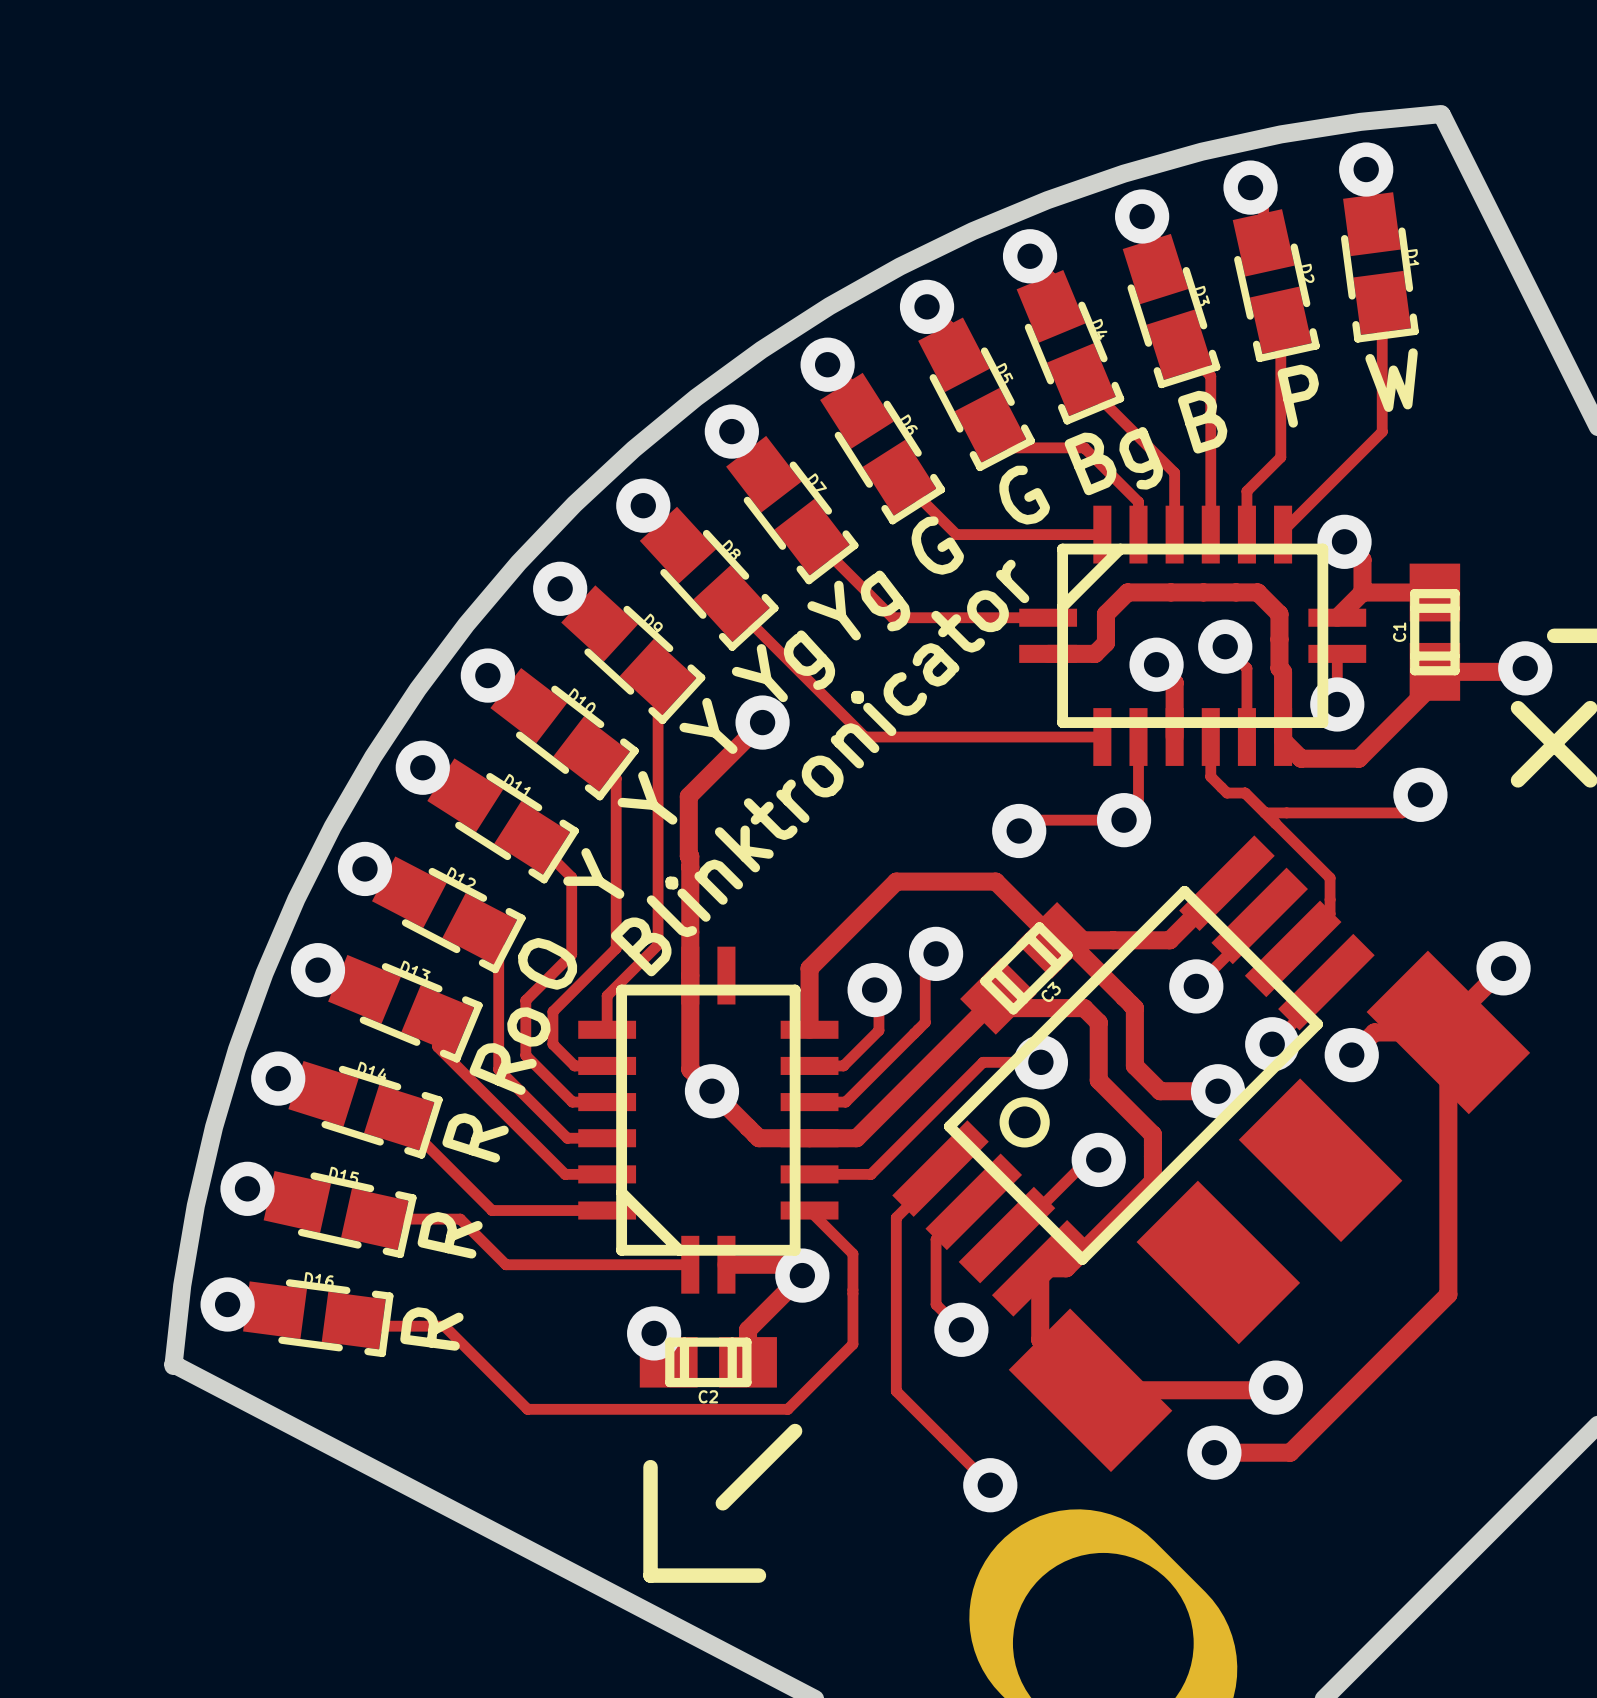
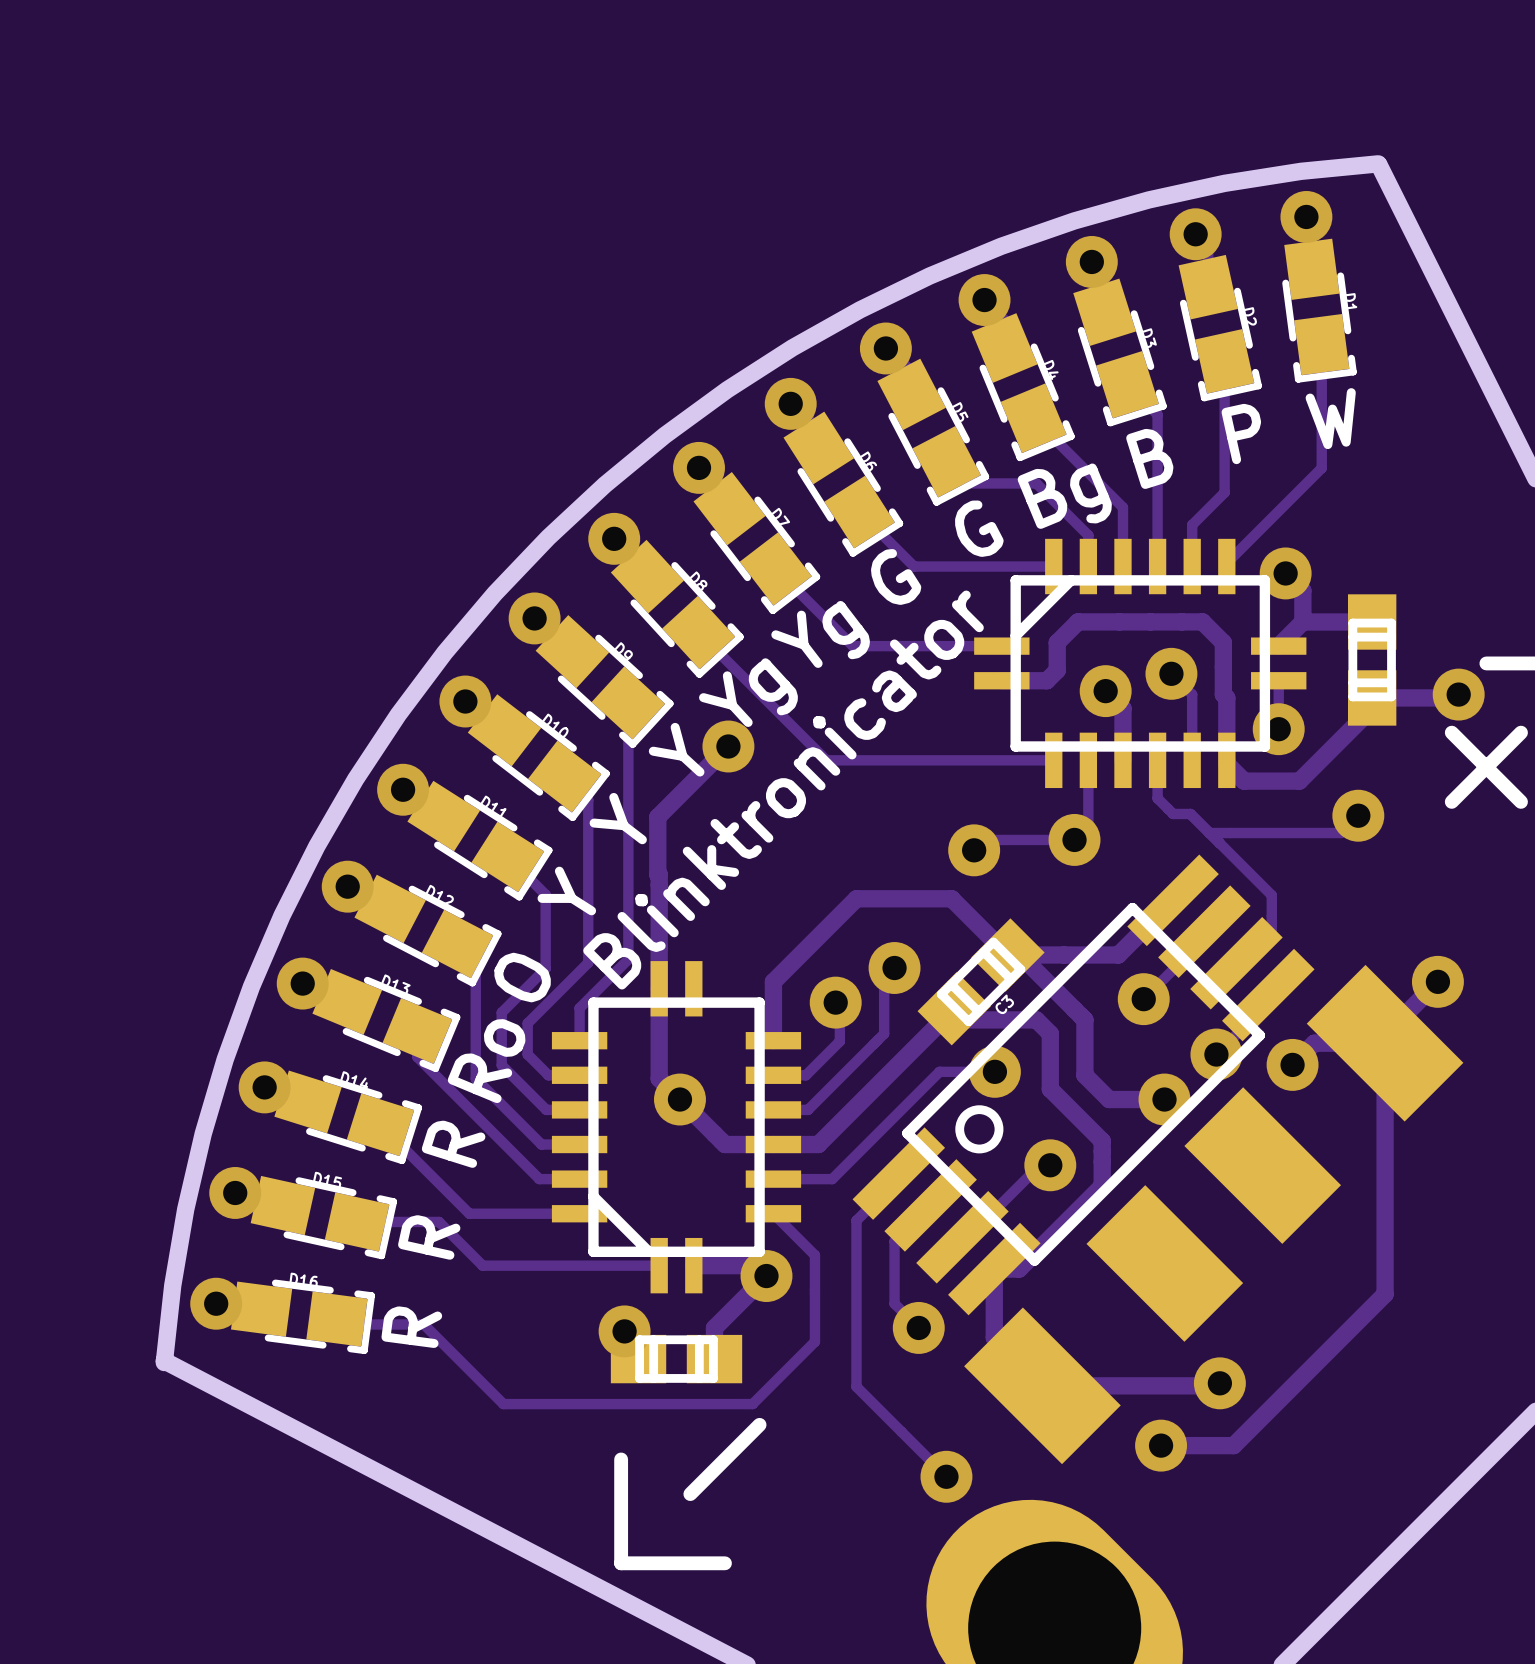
C1 name: C1 (1399, 632) -> none
C2 name: C2 (708, 1396) -> none

